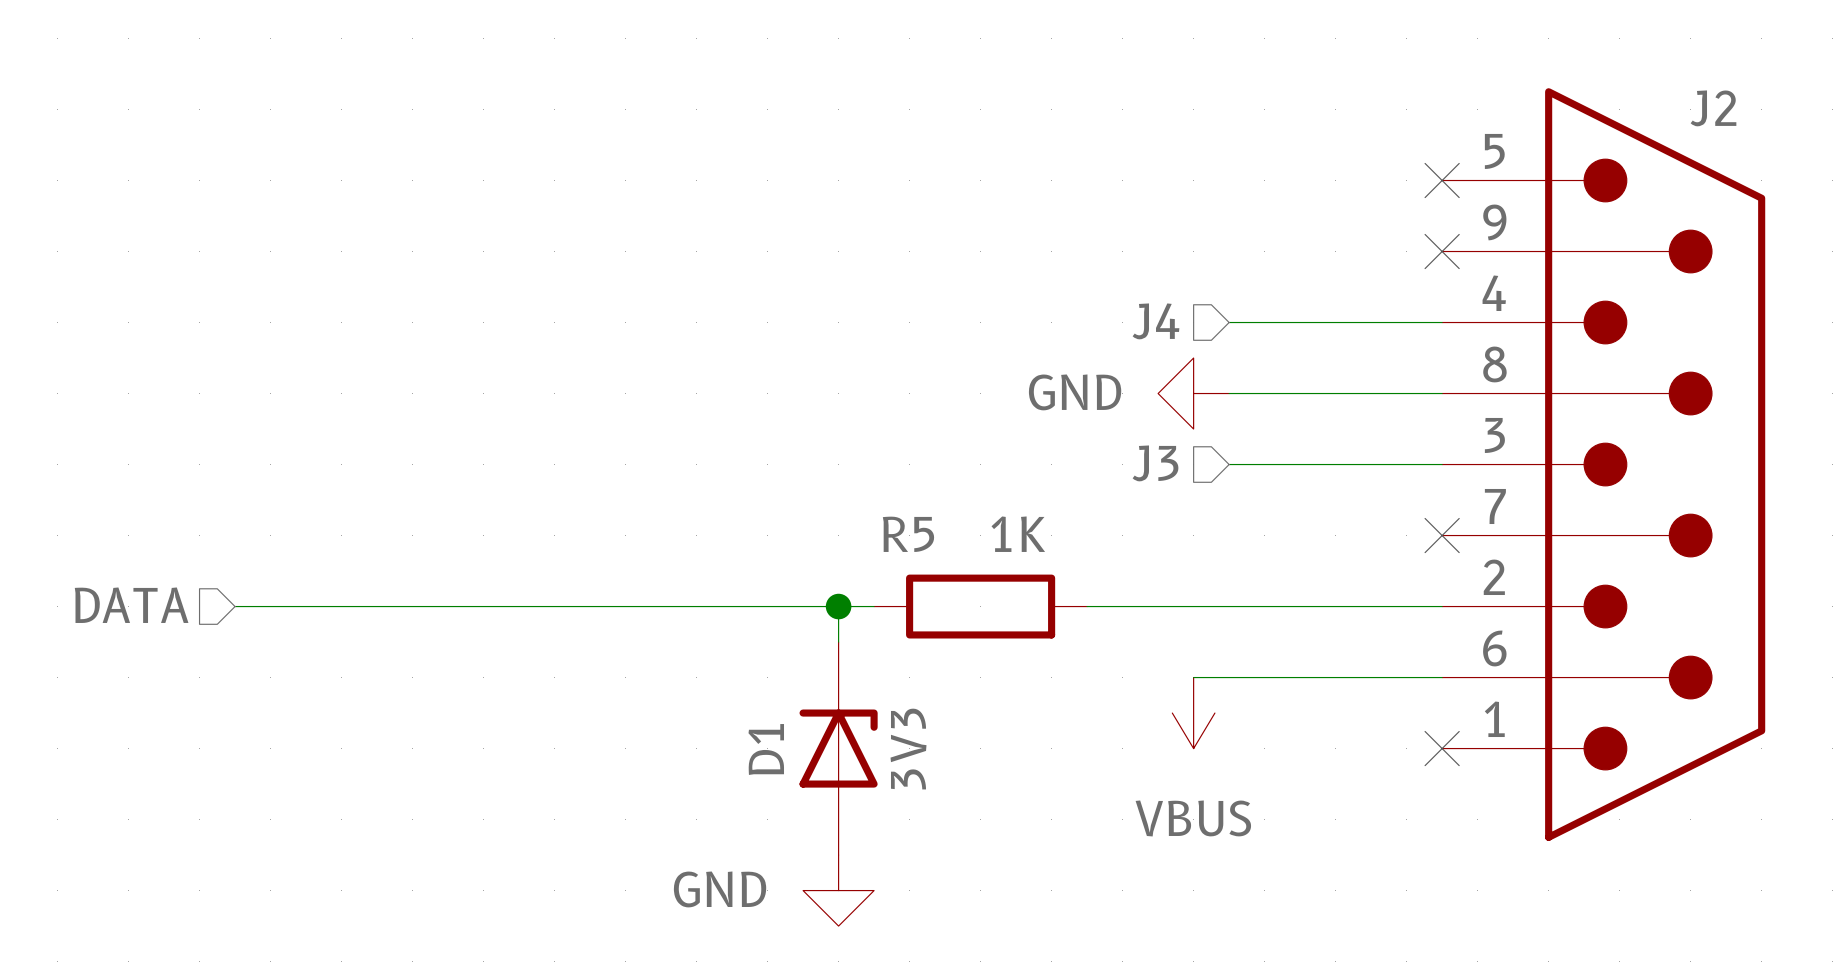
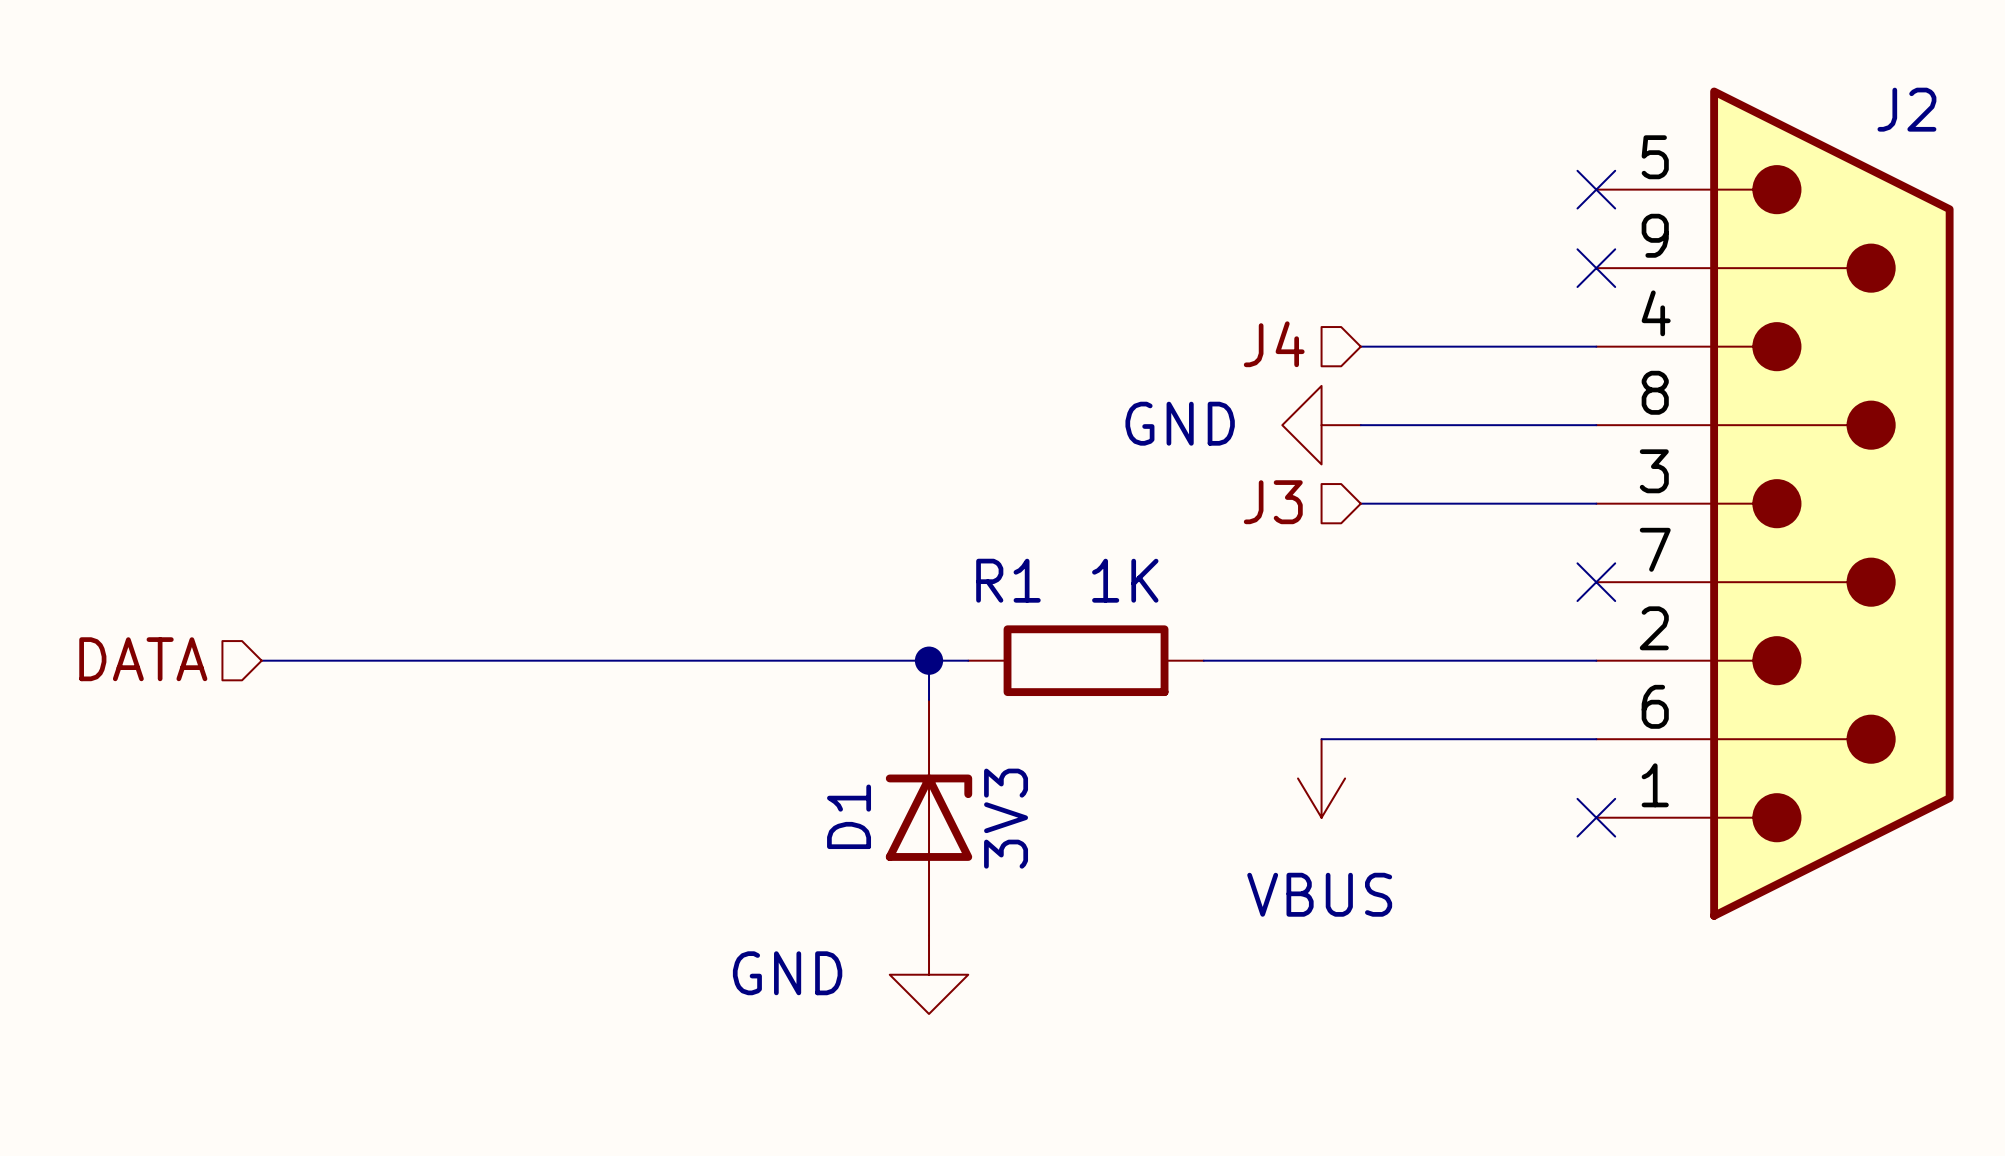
R5 name: R5 (908, 534) -> R1 (1008, 580)

